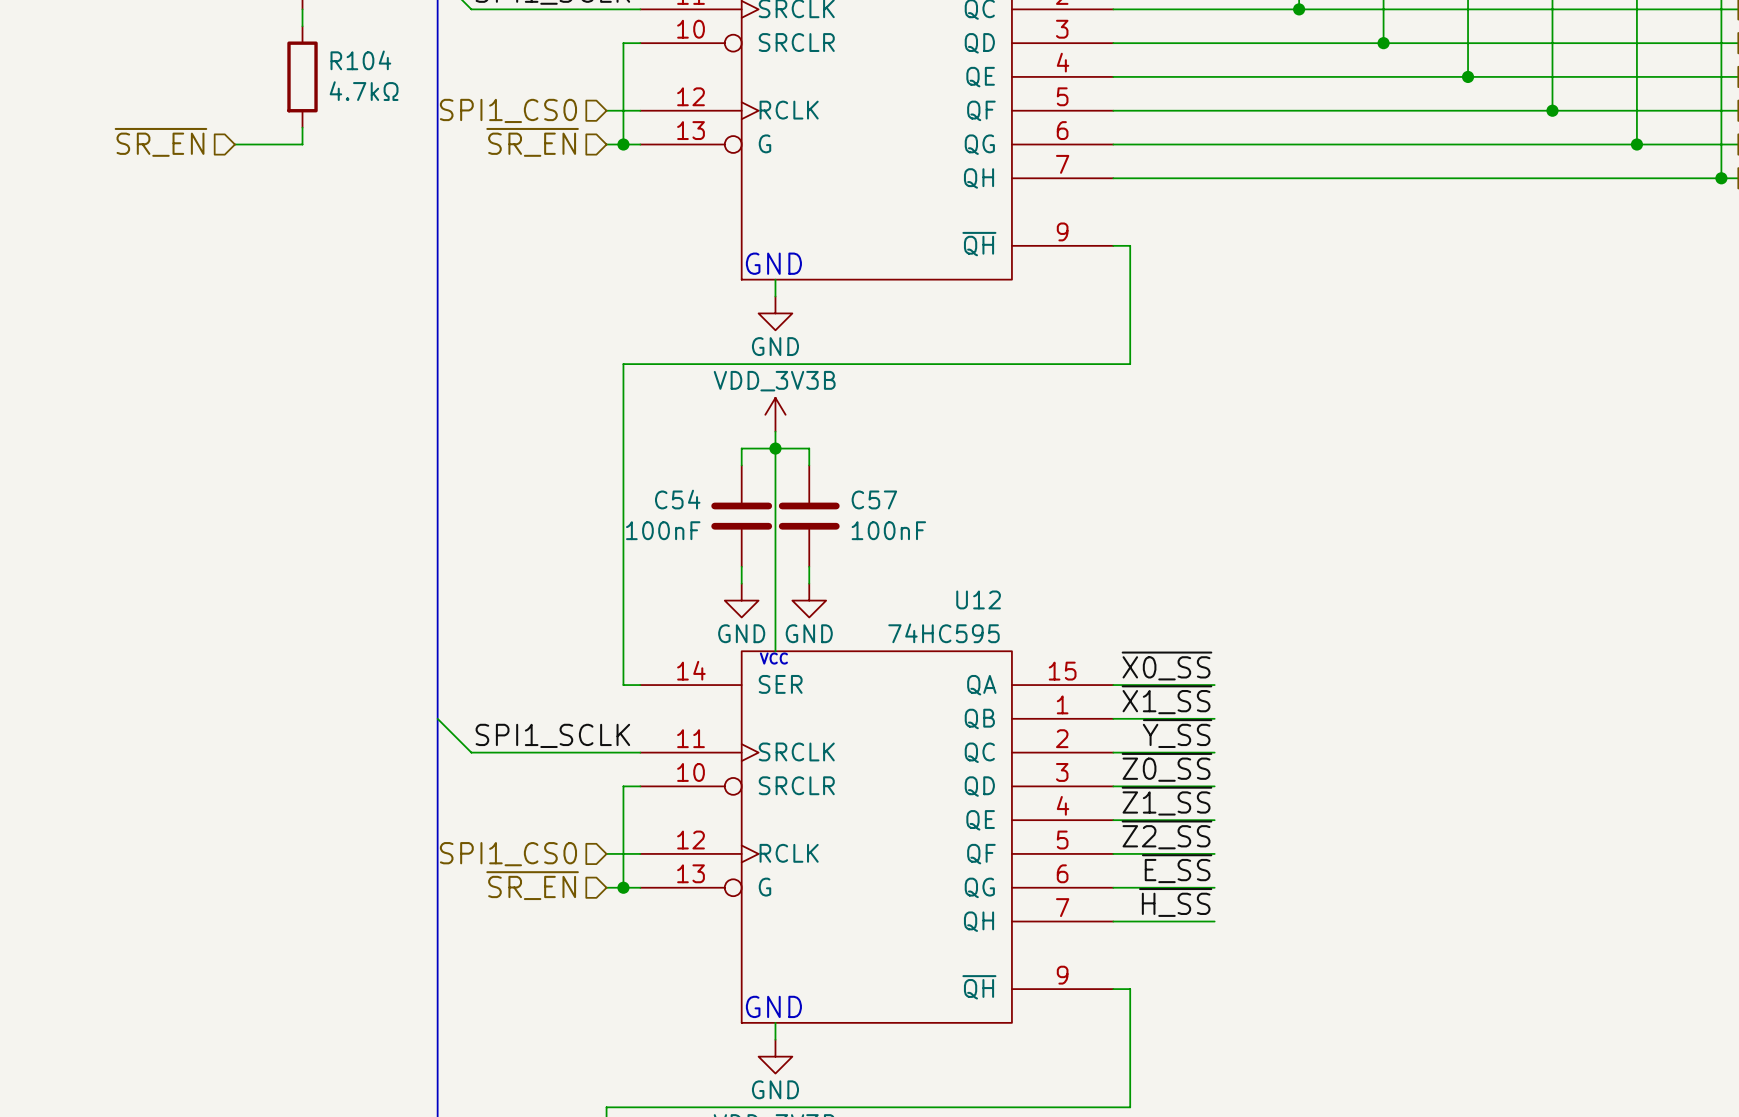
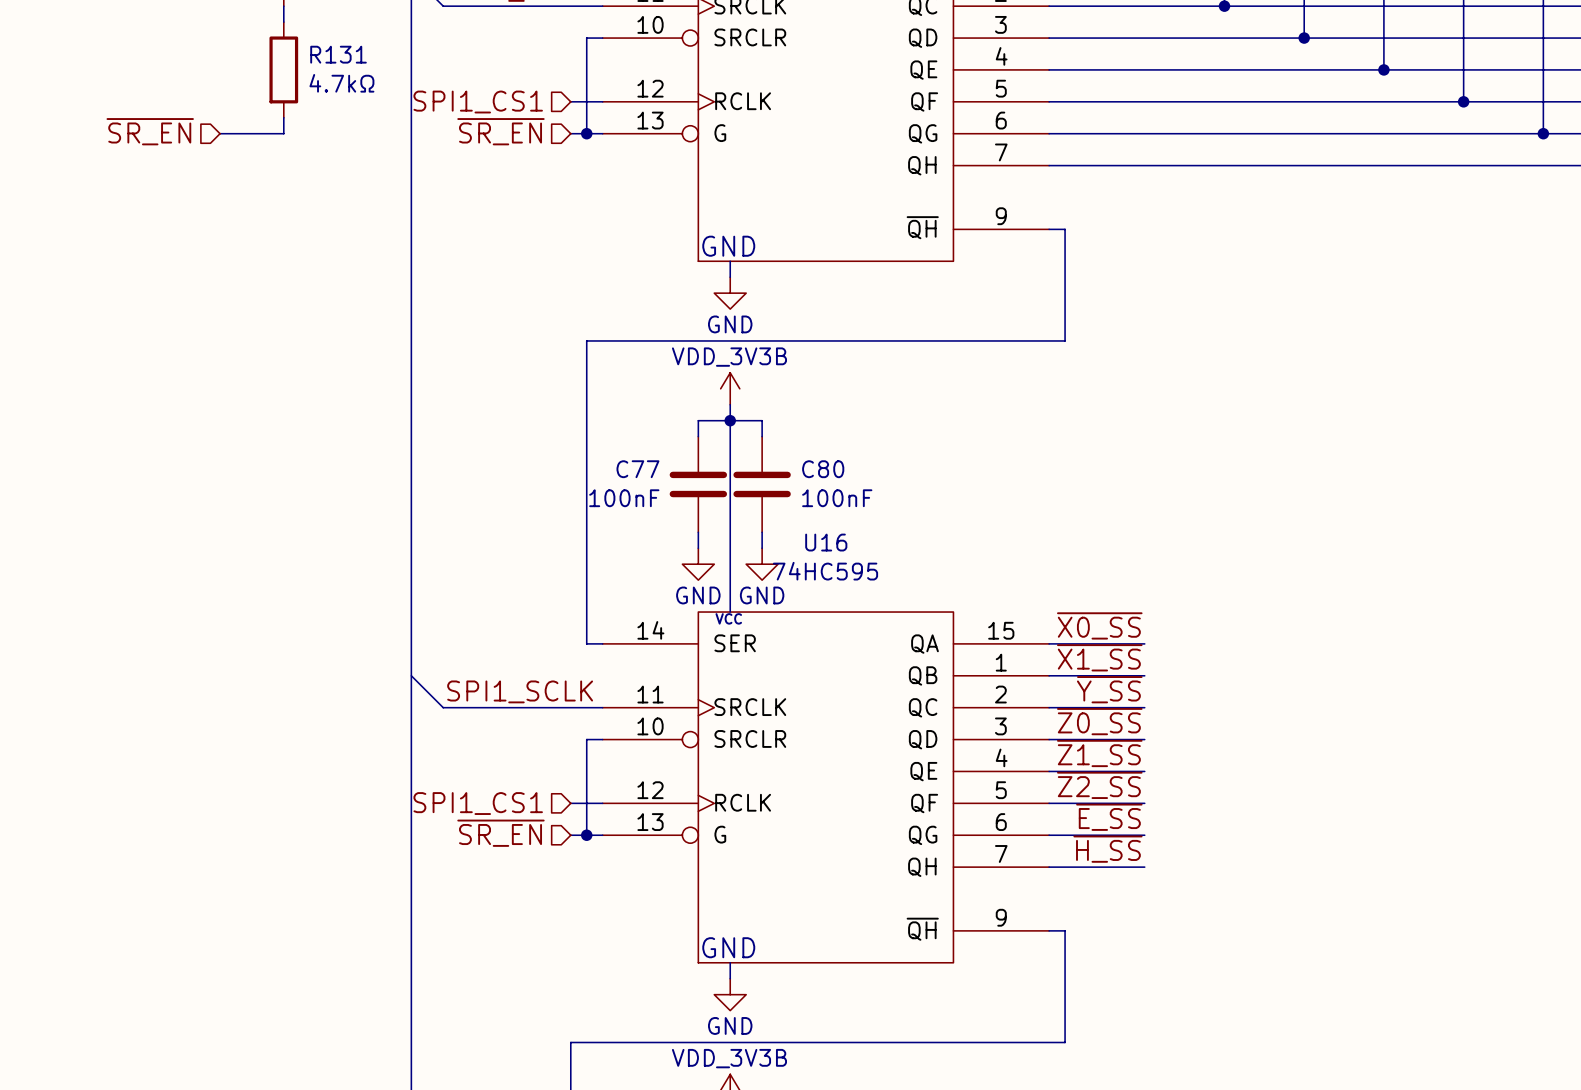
R104 name: R104 (360, 60) -> R131 (338, 54)
hierarchical label: SPI1_CS0 (508, 110) -> SPI1_CS1 (478, 102)
C54 name: C54 (677, 499) -> C77 (637, 469)
C57 name: C57 (874, 499) -> C80 (823, 469)
U12 name: U12 (978, 599) -> U16 (826, 542)
U12 value position: 74HC595 (943, 633) -> 74HC595 (825, 571)
hierarchical label: SPI1_CS0 (508, 854) -> SPI1_CS1 (478, 803)

